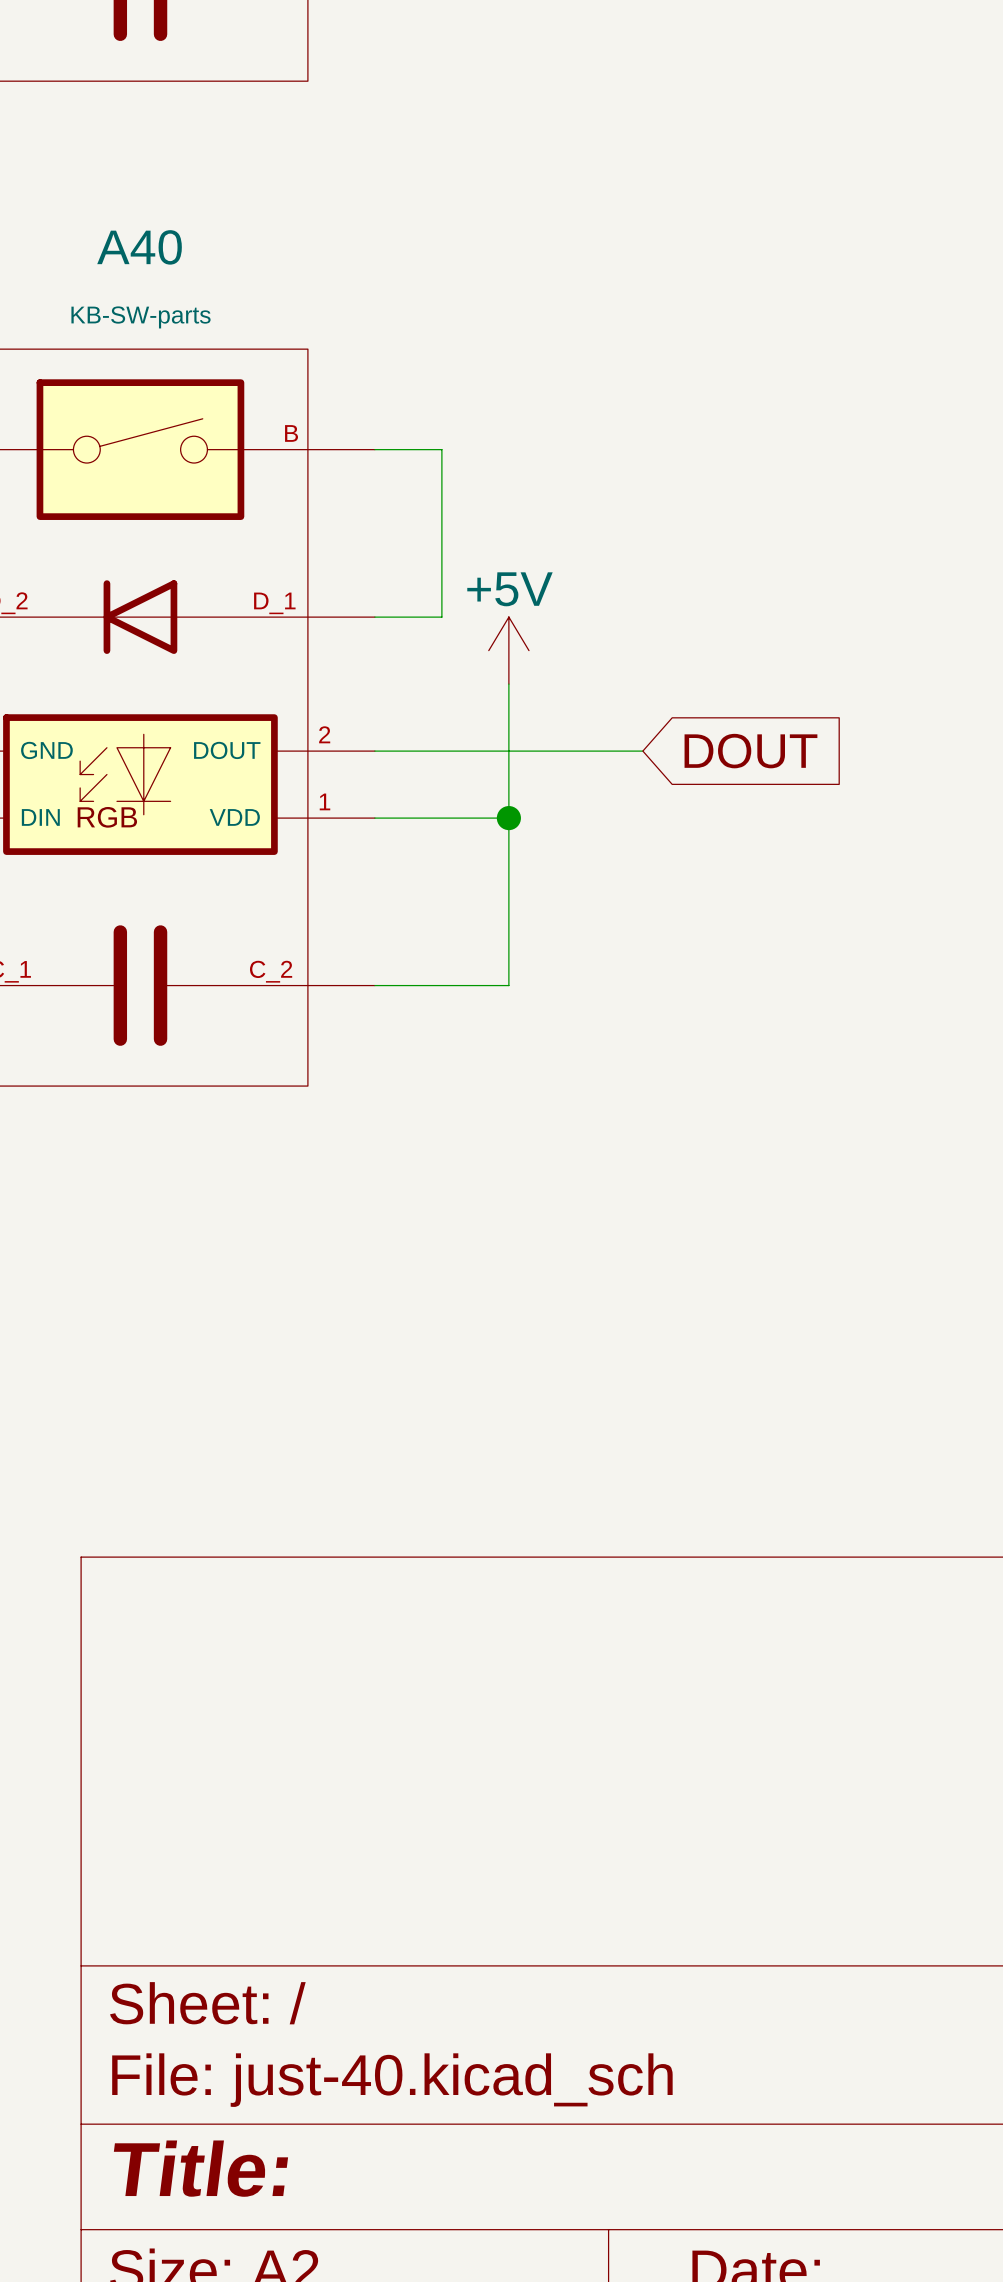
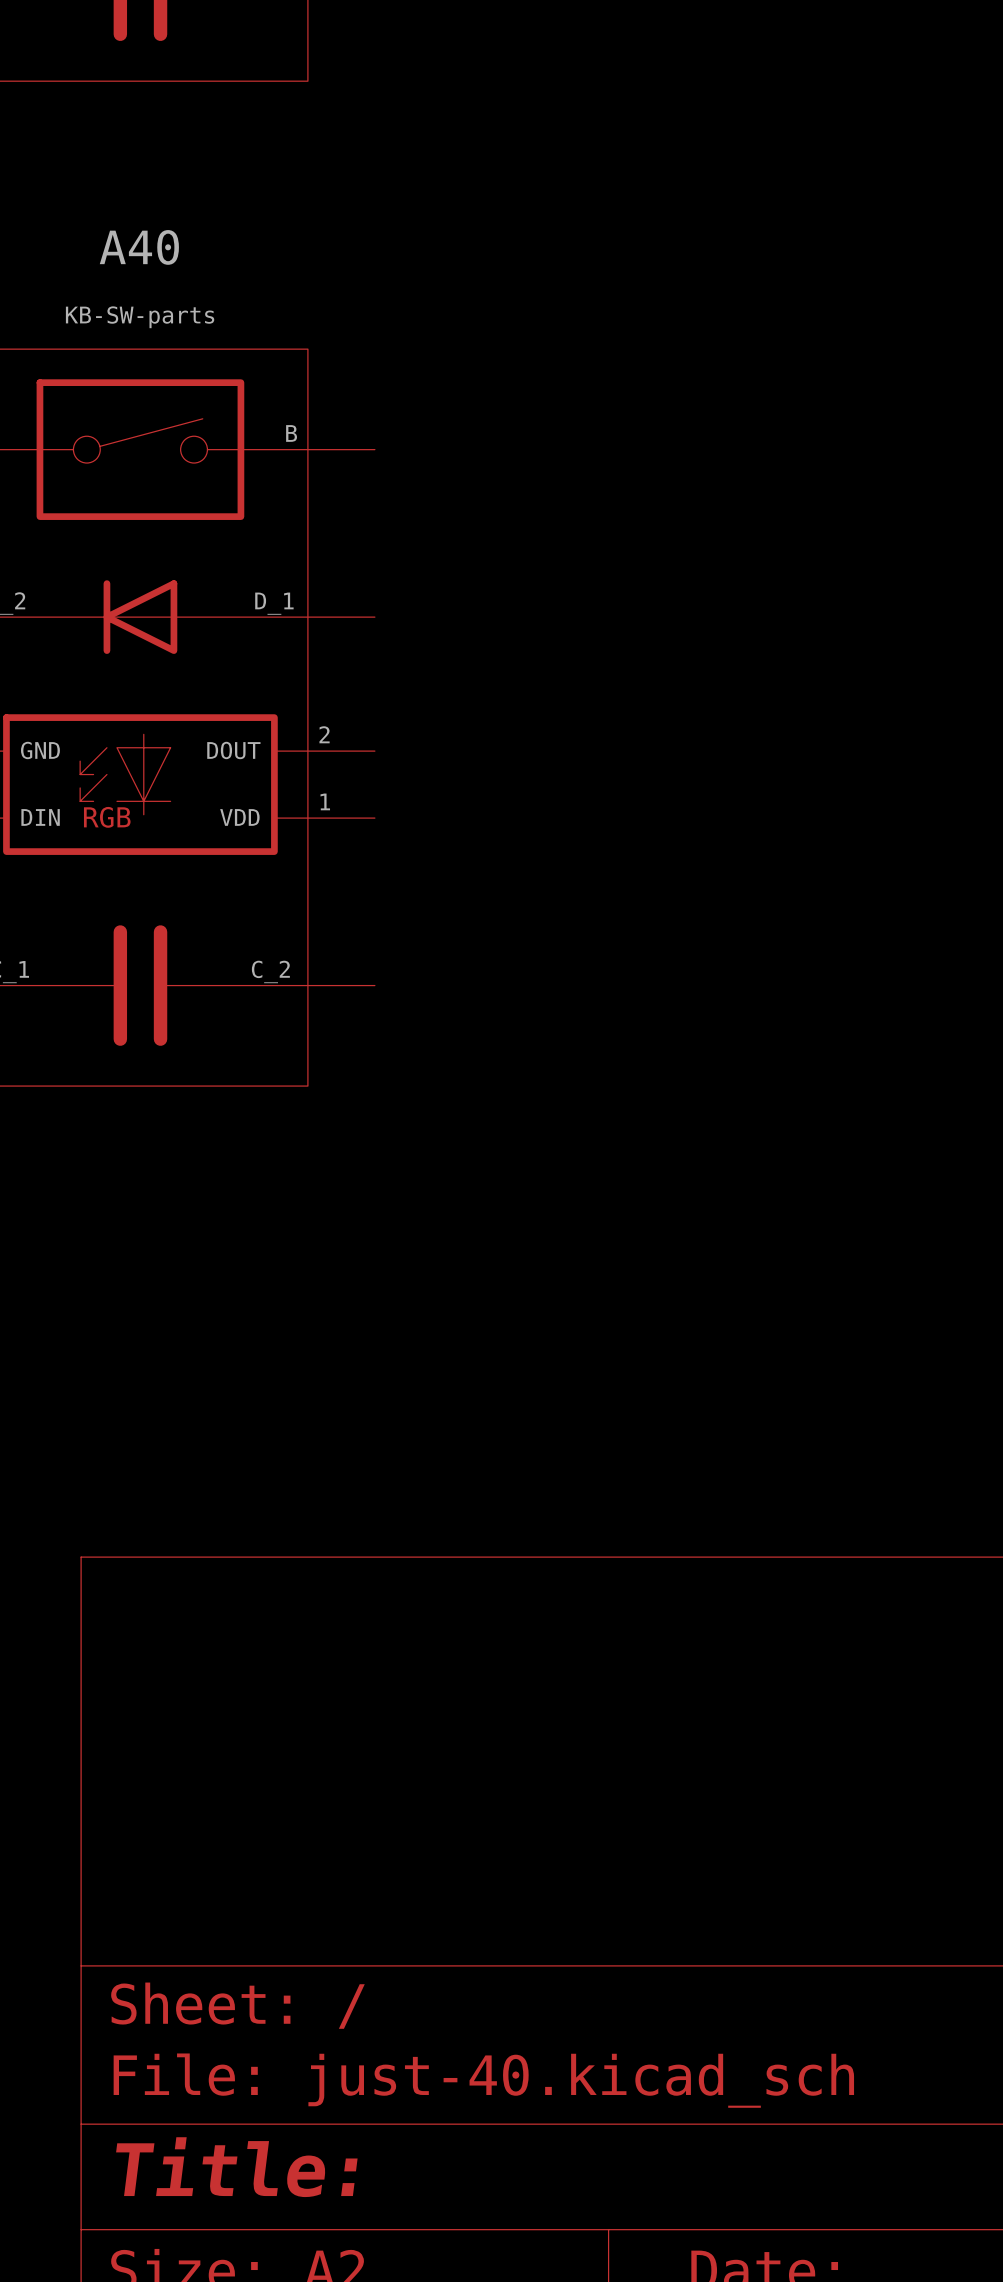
wire: (374, 449) (441, 449) (441, 617) (374, 617) -> none
power symbol: +5V (508, 650) -> none
wire: (508, 684) (508, 985) (374, 985) -> none
wire: (374, 751) (642, 751) -> none
global label: DOUT (750, 751) -> none
wire: (374, 818) (508, 818) -> none
junction: (508, 818) -> none

